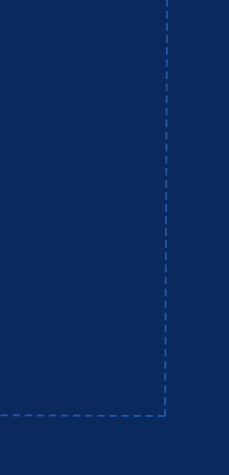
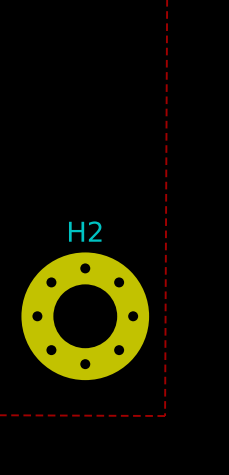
H2: none -> (85, 316)

